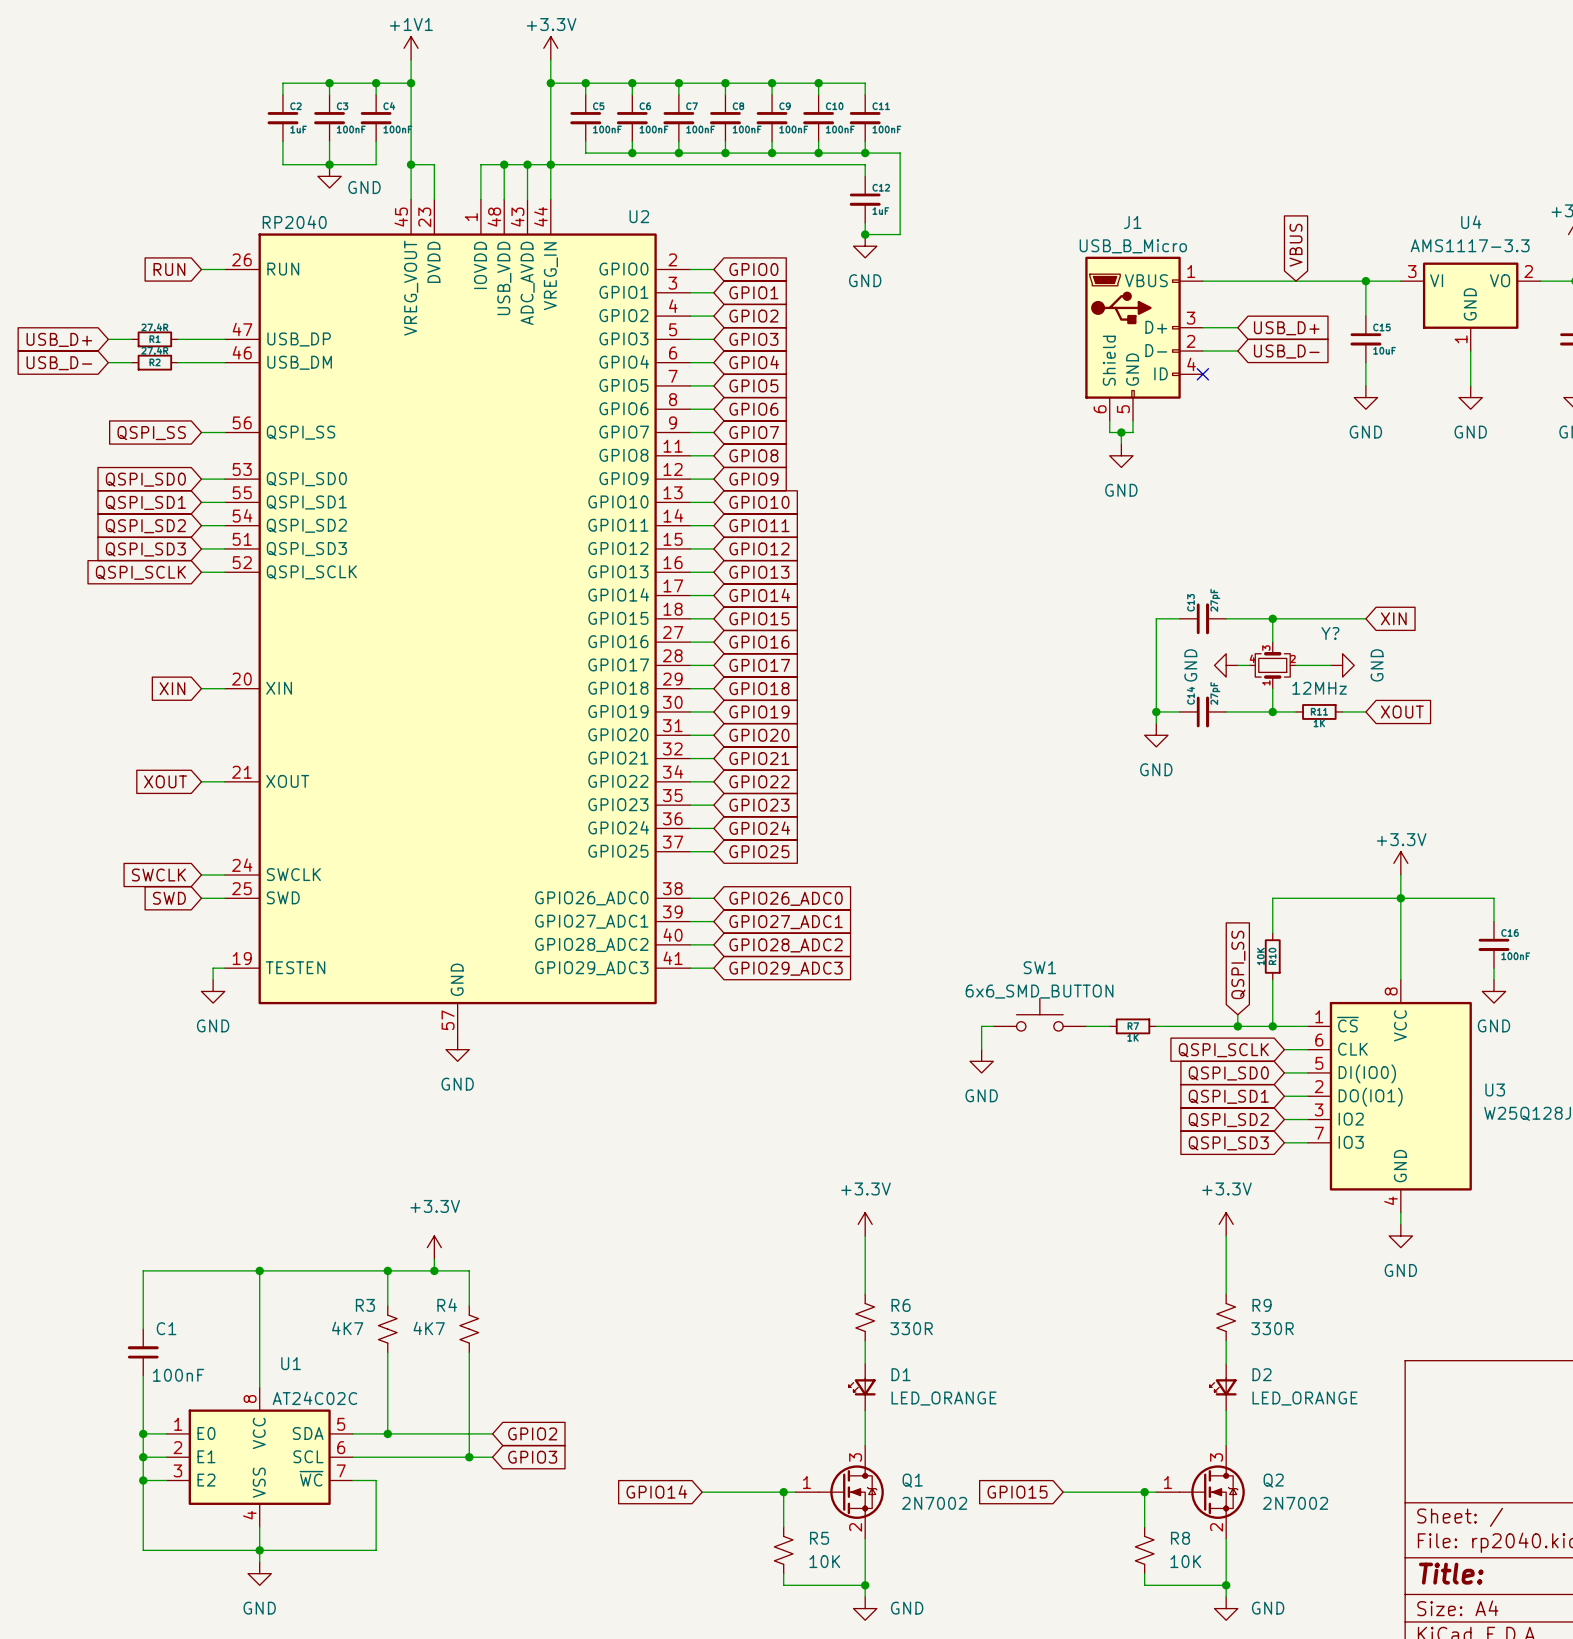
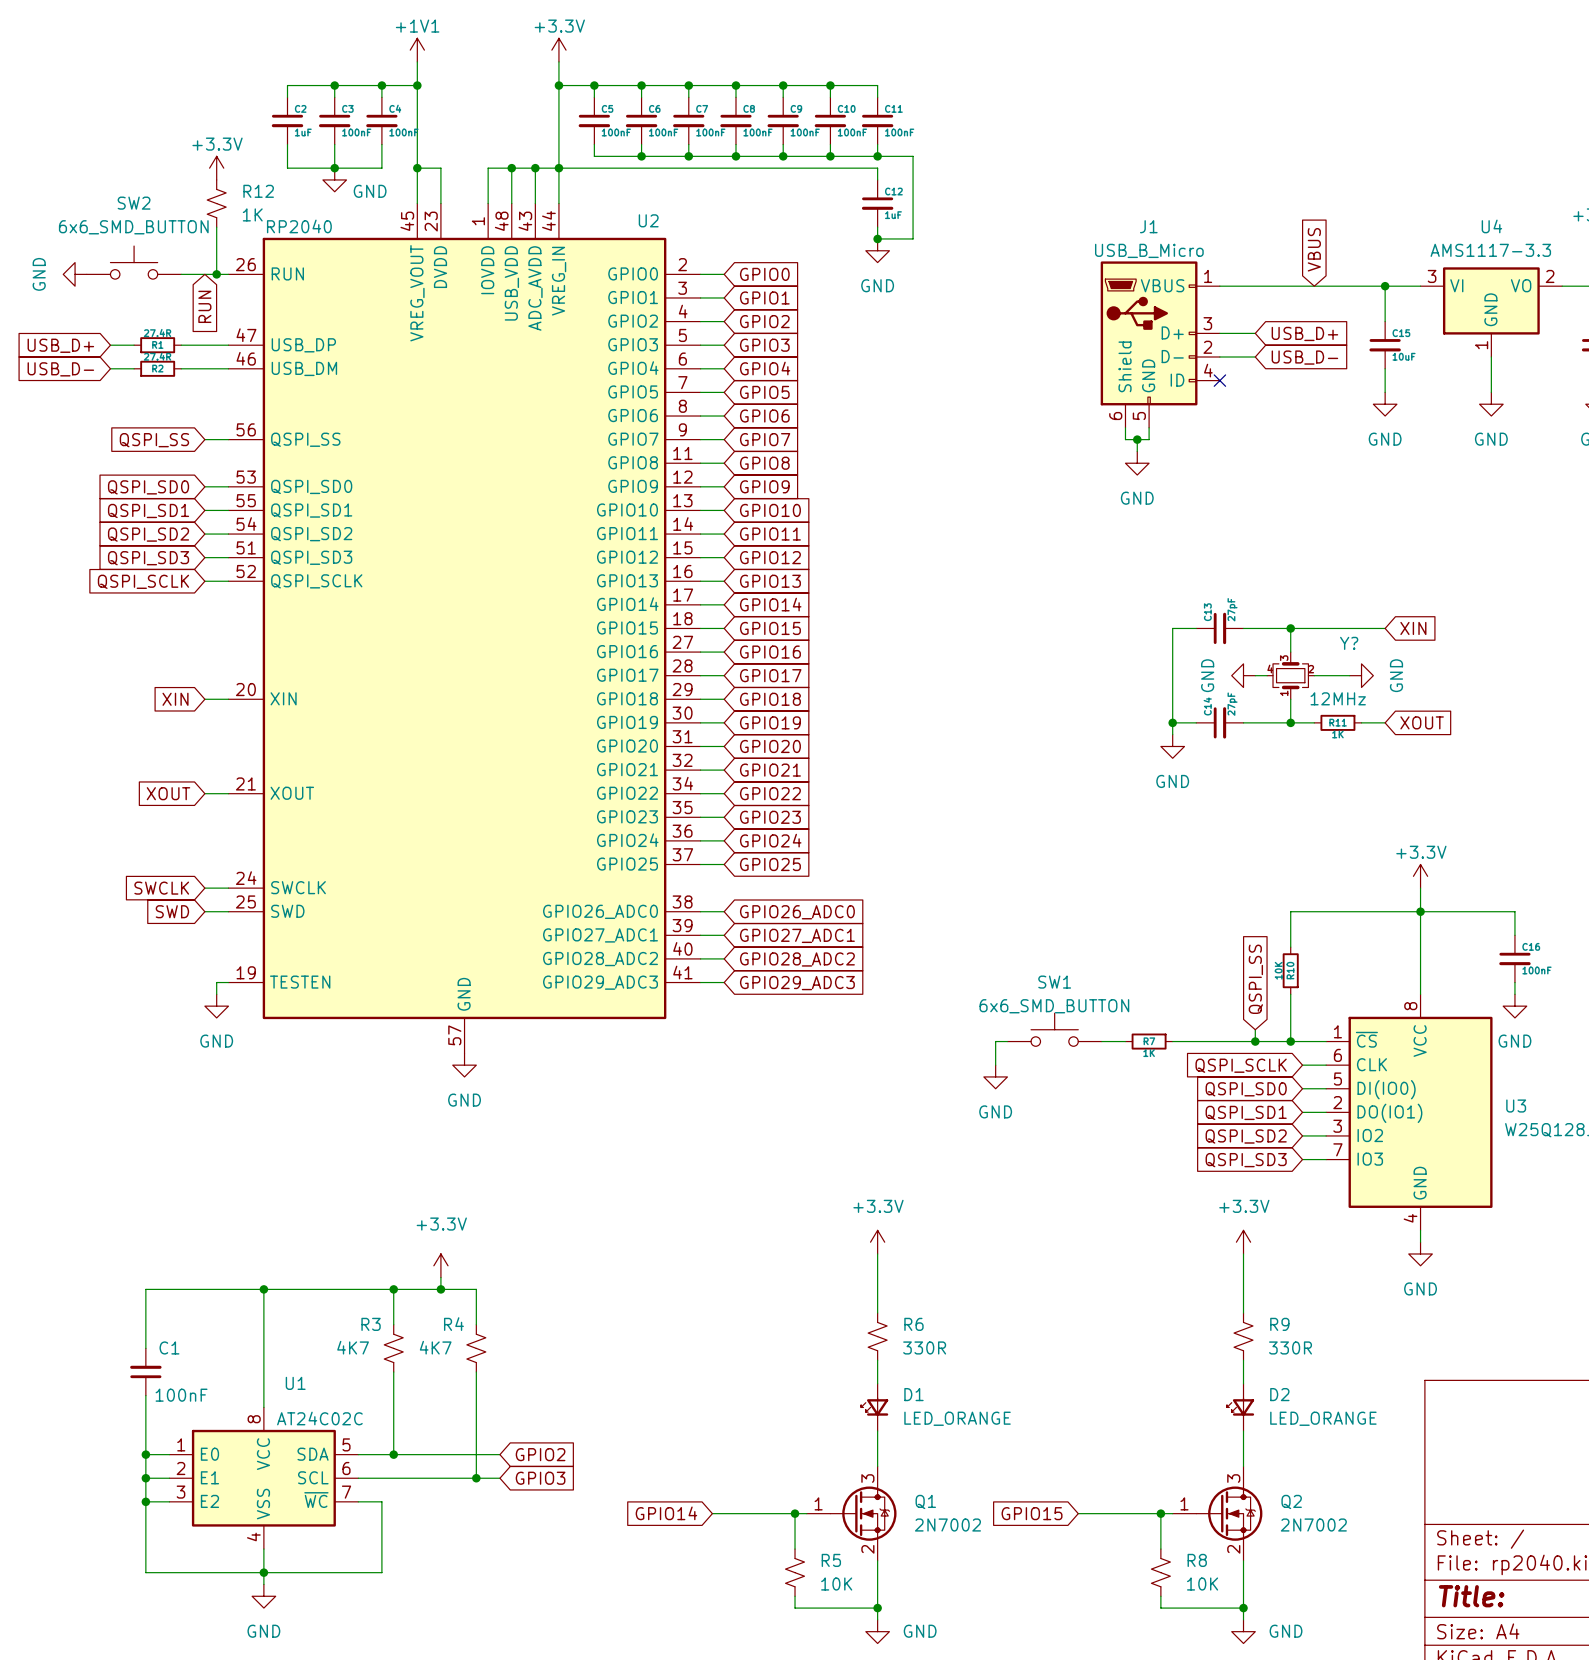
power symbol: none -> +3.3V (216, 168)
R12: none -> 1K (216, 203)
wire: none -> (216, 227) (216, 274)
SW2: none -> 6x6_SMD_BUTTON (134, 262)
power symbol: none -> GND (75, 274)
global label rotation: 0° (169, 269) -> 90° counterclockwise (204, 306)
wire: none -> (181, 274) (204, 274)
junction: none -> (216, 274)

